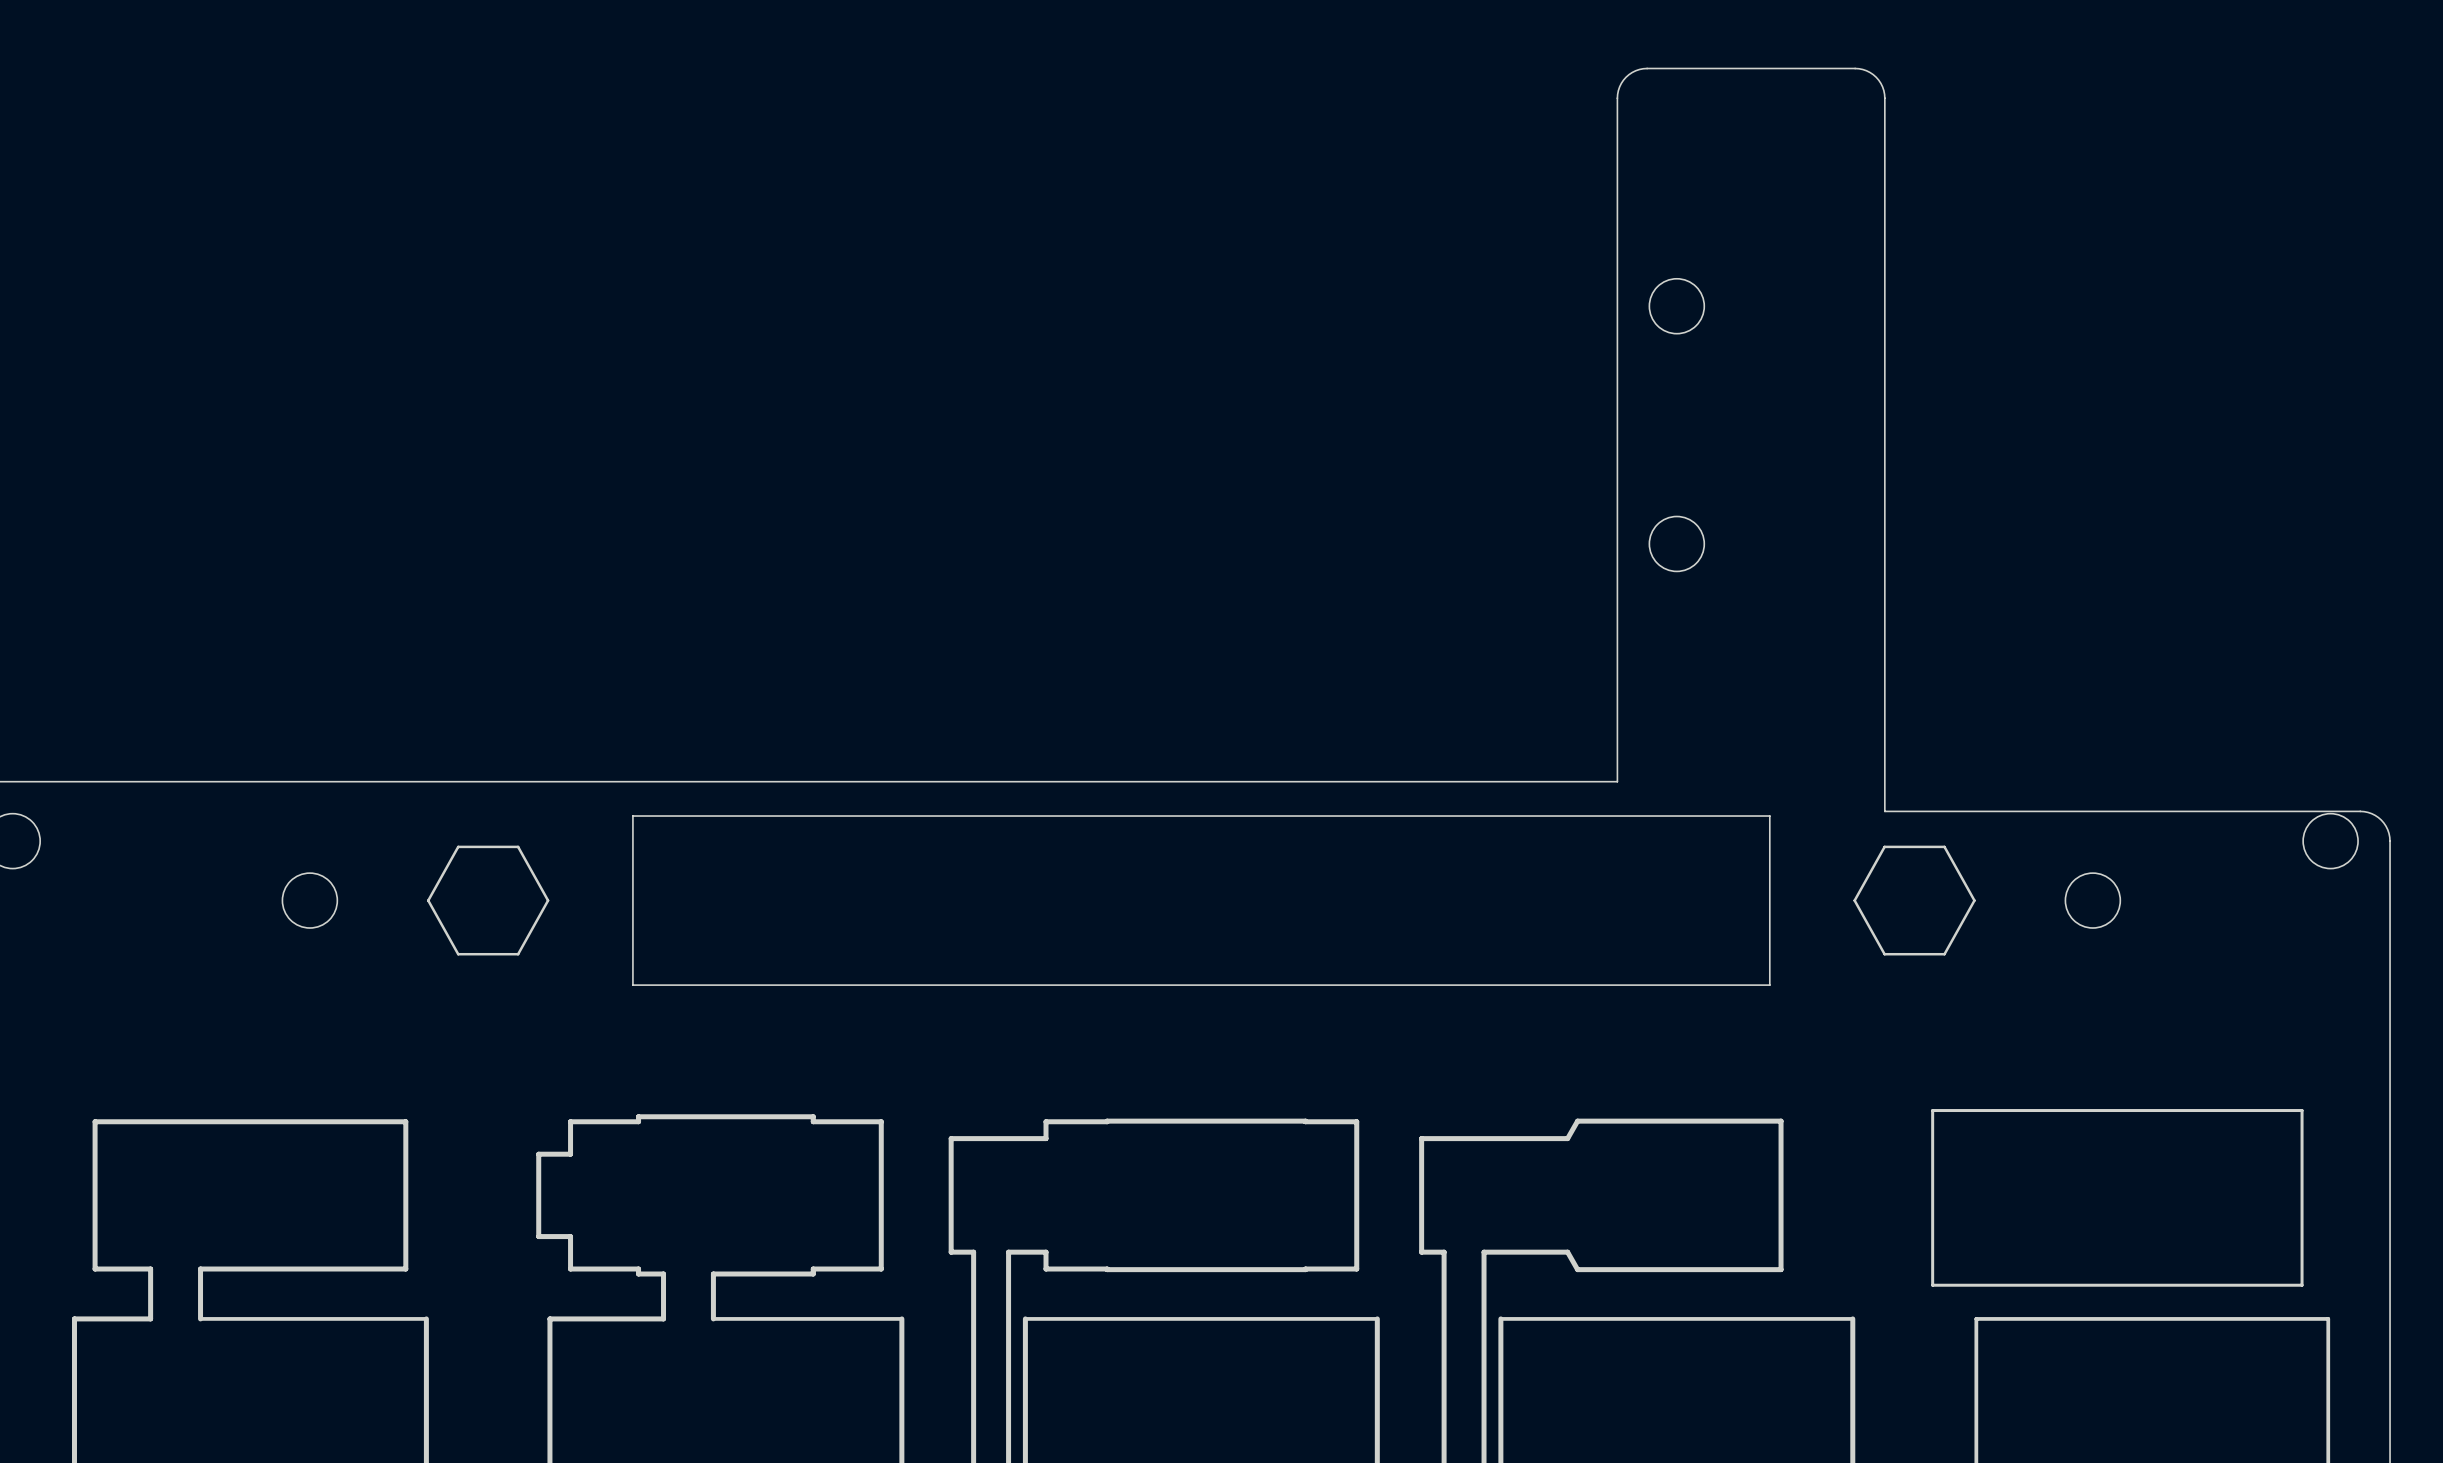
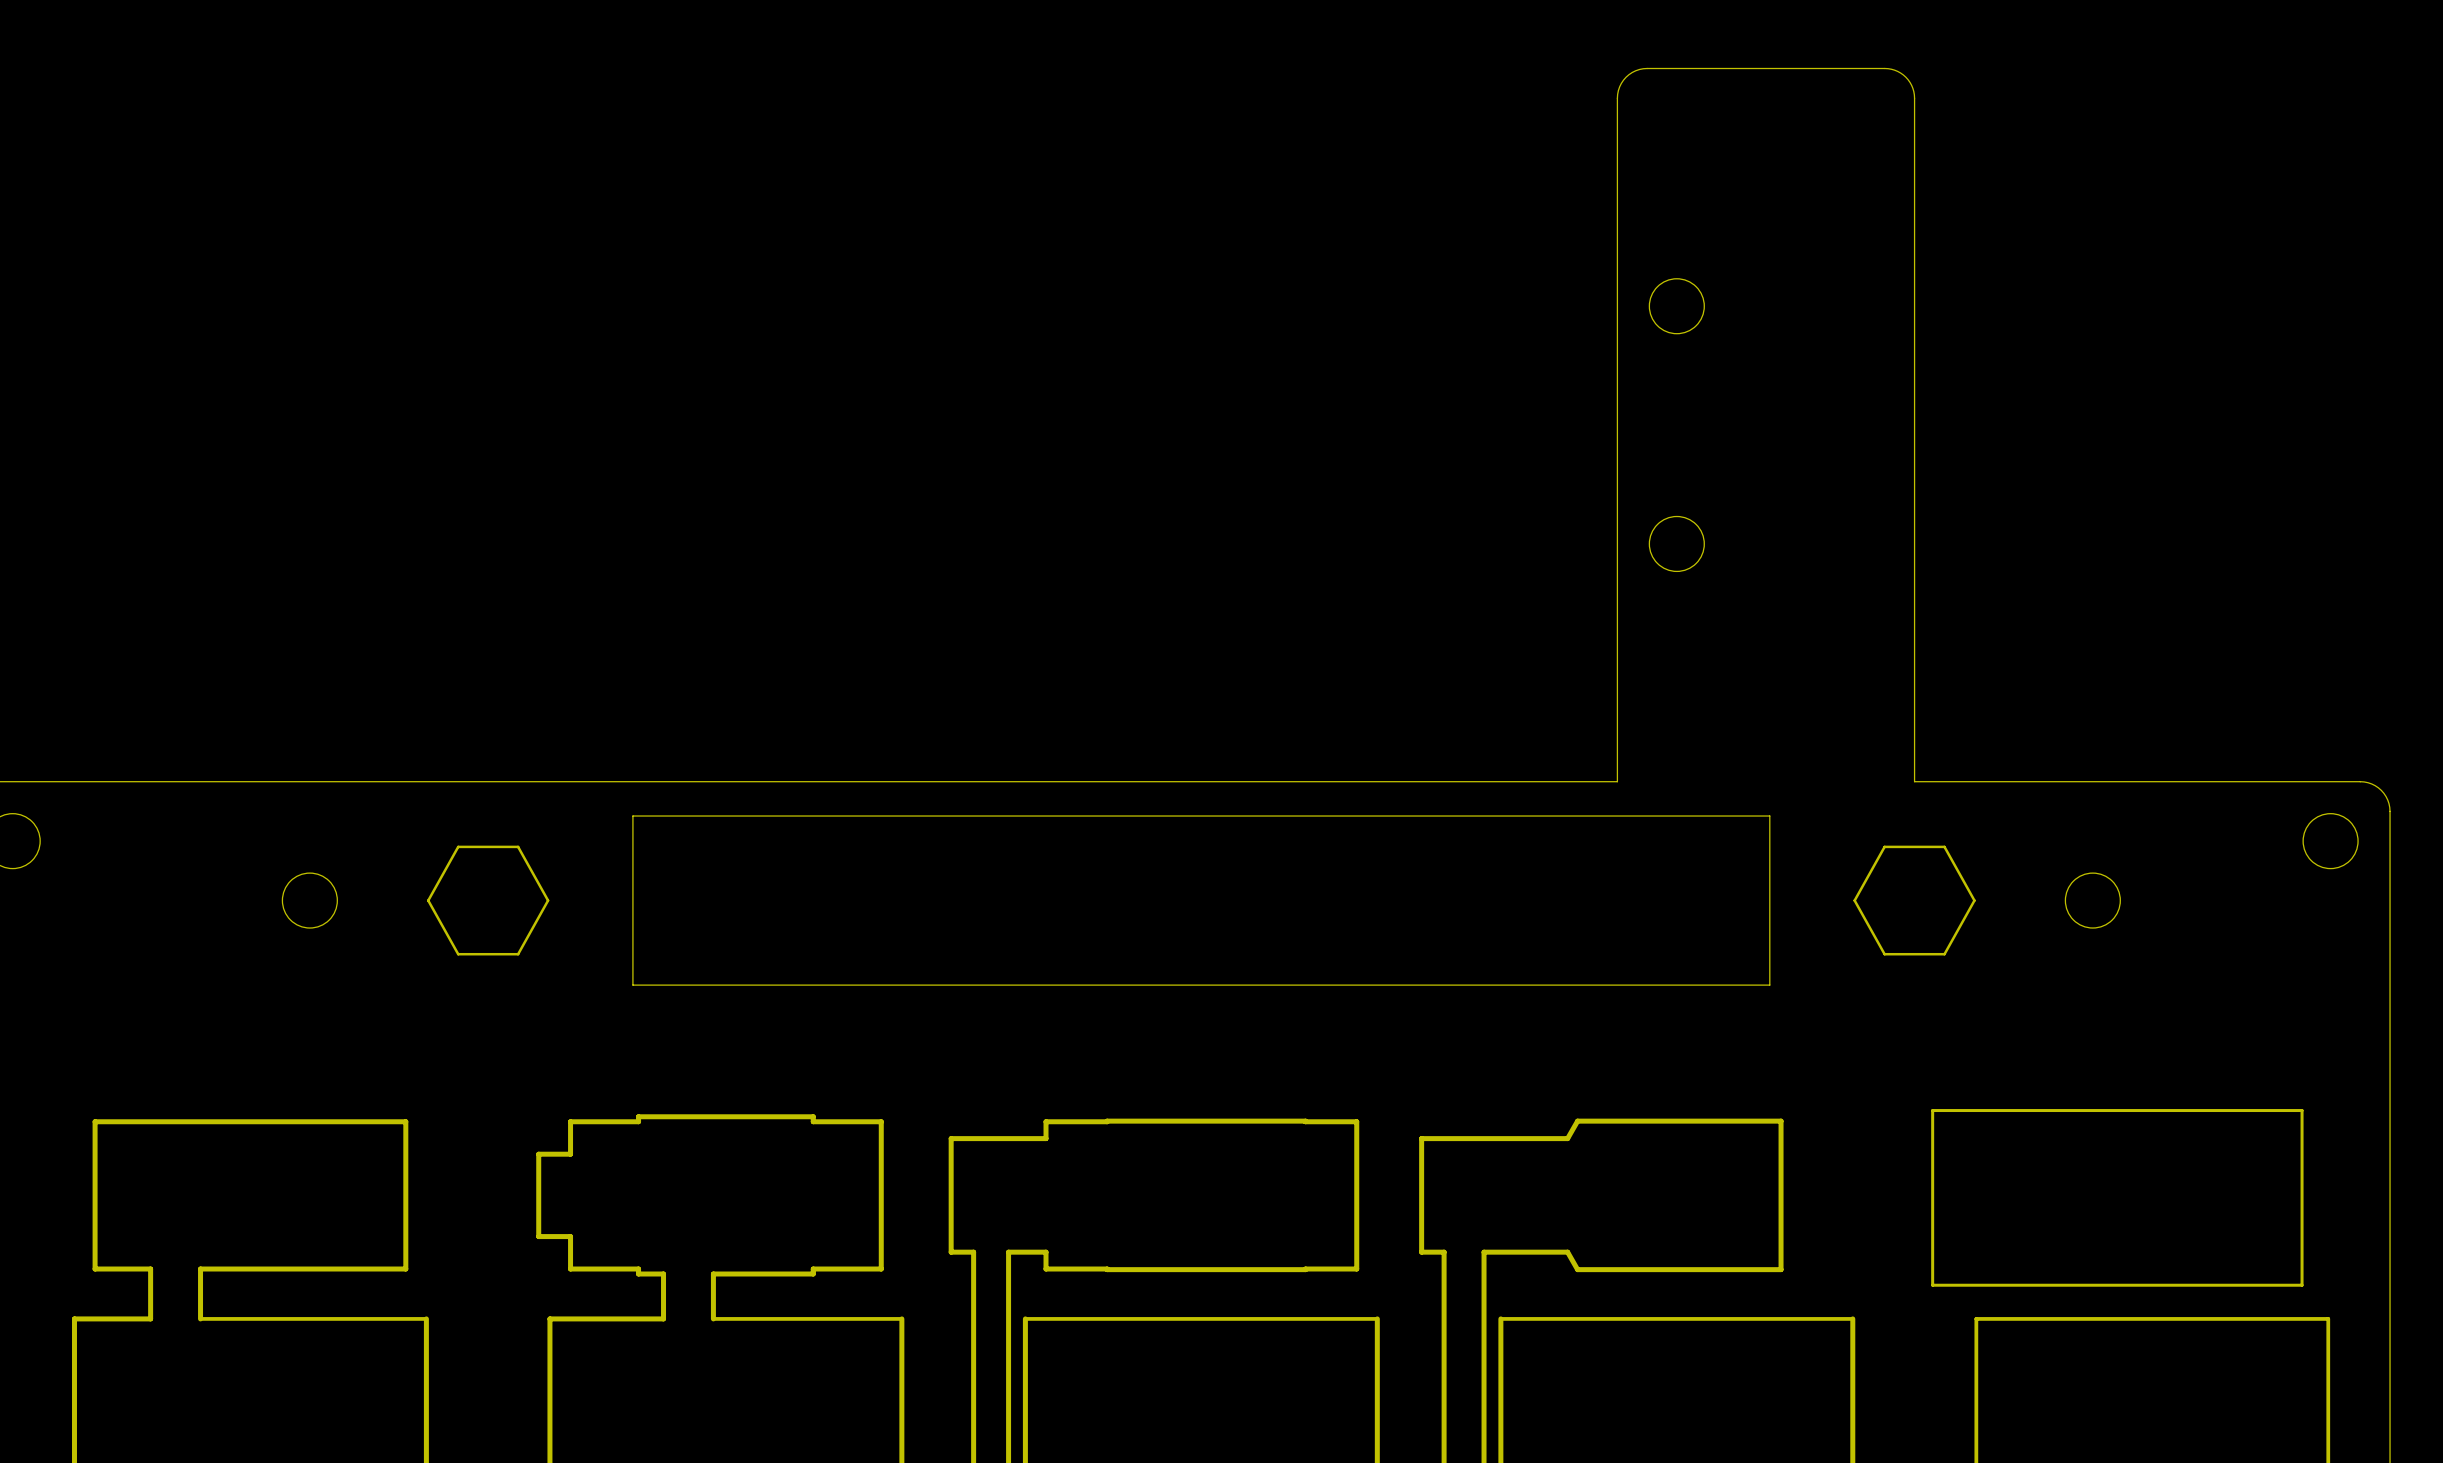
board edge: (1855, 68) (1866, 70) (1876, 77) (1882, 86) (1884, 98) (1884, 811) (2360, 811) (2371, 813) (2381, 820) (2387, 829) (2390, 841) -> (1855, 68) (1888, 68) (1897, 71) (1910, 82) (1914, 94) (1914, 781) (2364, 781) (2378, 787) (2387, 800) (2390, 811) (2390, 841)

